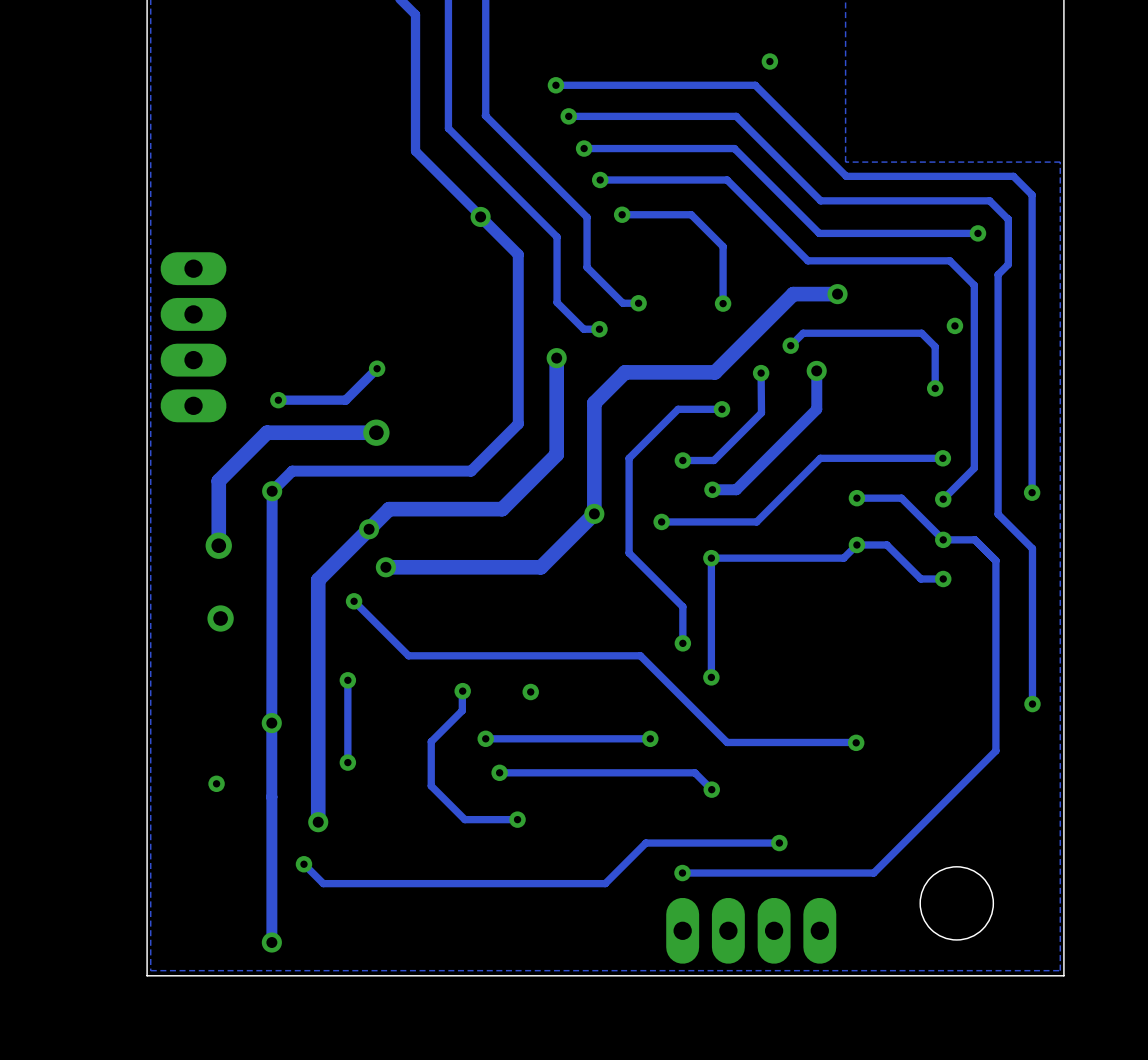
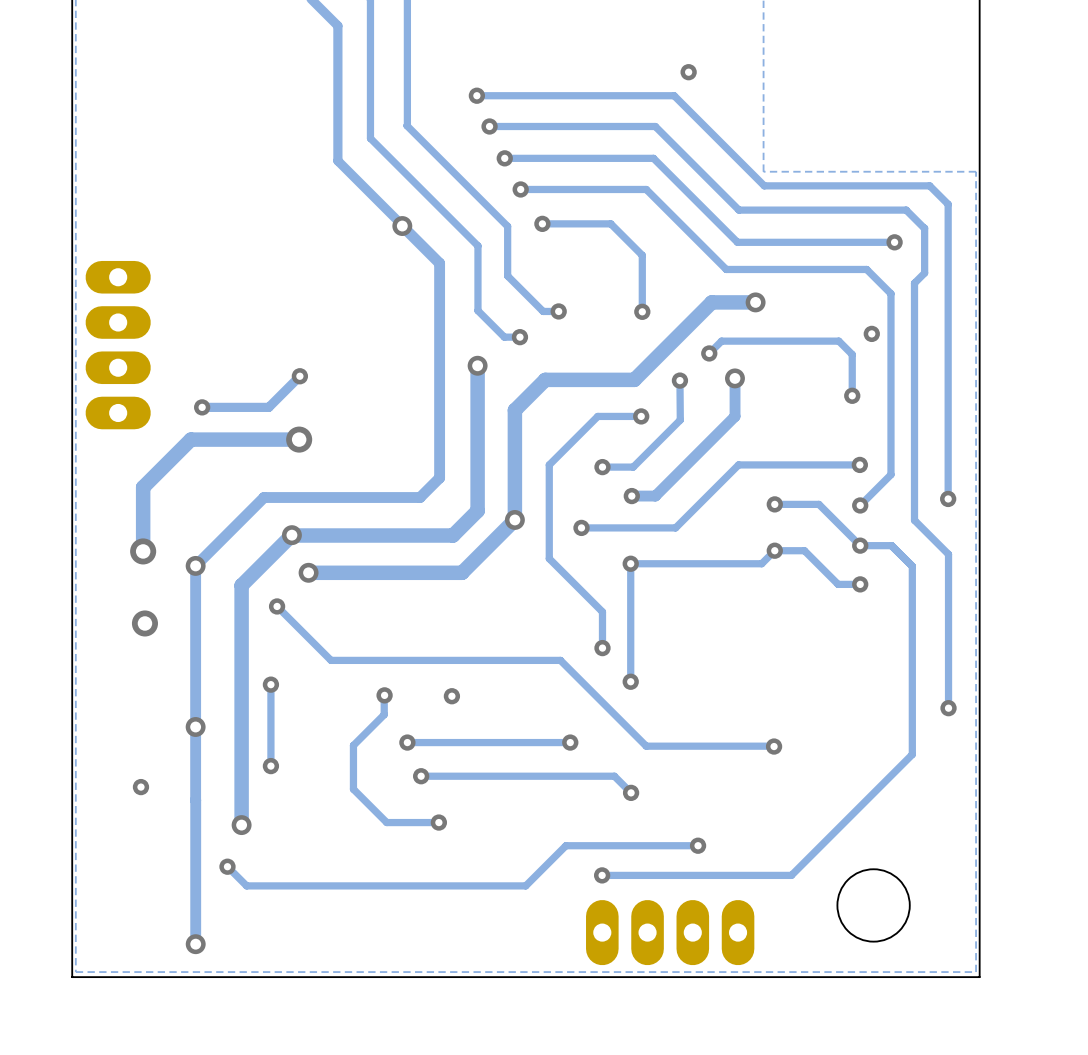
track: (518, 423) (471, 471) (292, 471) (272, 491) (271, 723) -> (439, 430) (439, 477) (420, 497) (264, 497) (195, 565) (195, 726)
track: (556, 454) (502, 509) (389, 509) (369, 529) -> (477, 461) (477, 510) (453, 535) (292, 535)
via position: (272, 491) -> (195, 565)

